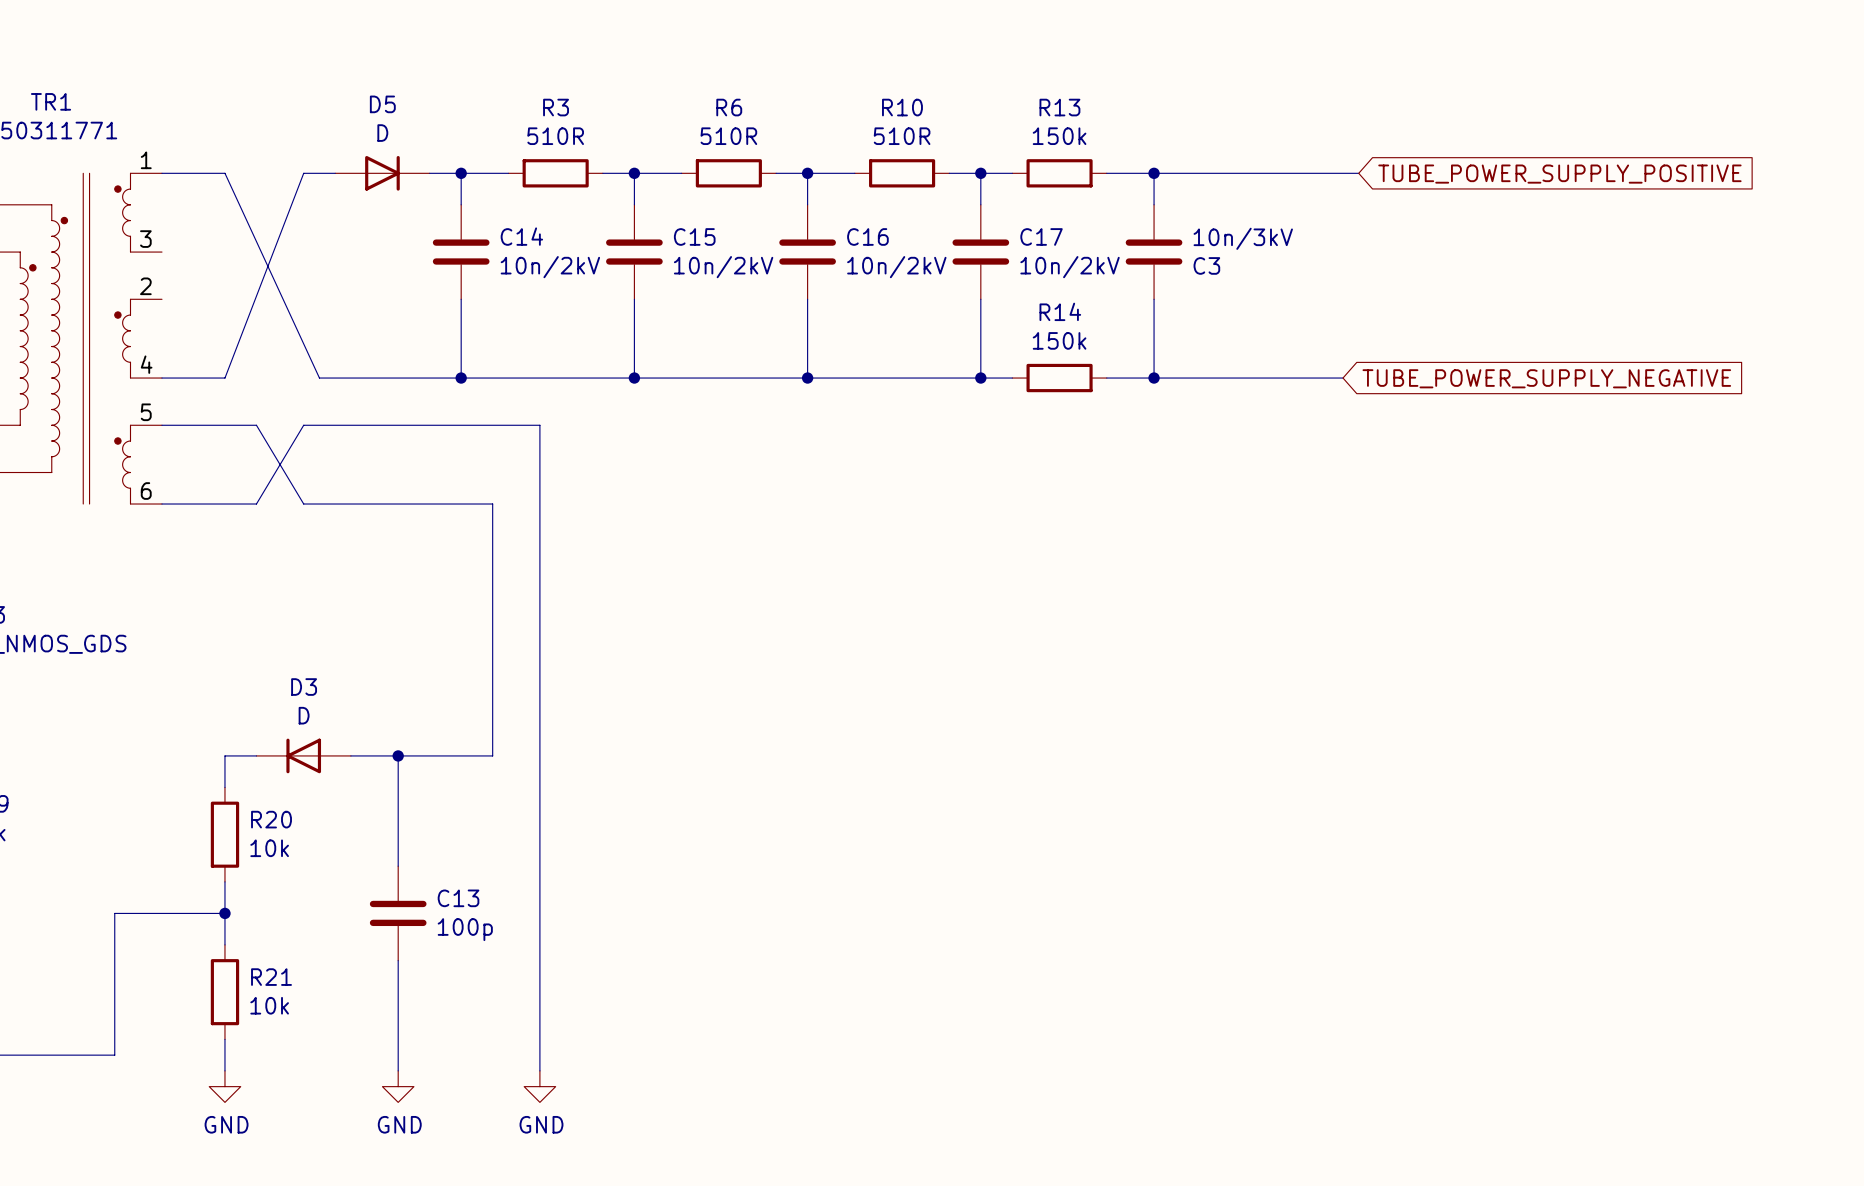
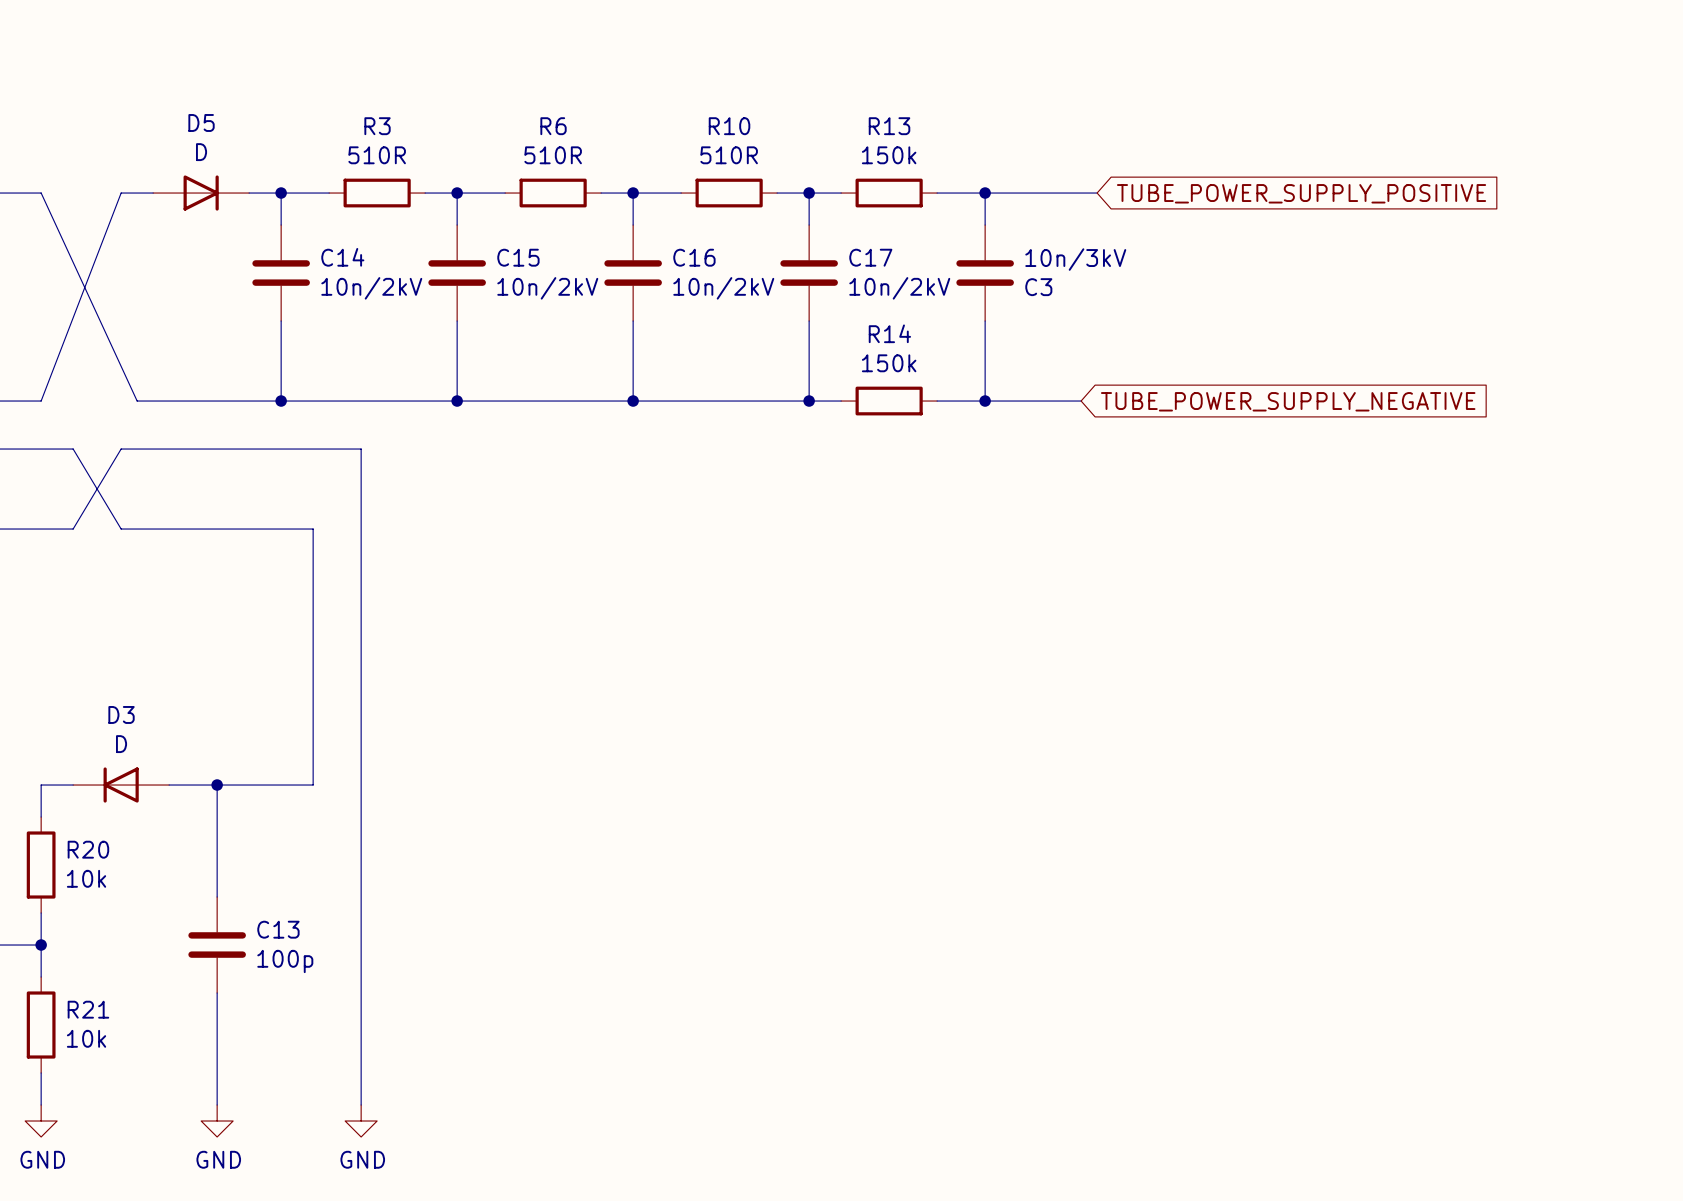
wire: (1264, 173) (1358, 173) -> none
global label position: TUBE_POWER_SUPPLY_POSITIVE (1559, 174) -> TUBE_POWER_SUPPLY_POSITIVE (1301, 193)
wire: (1248, 378) (1343, 378) -> none
global label position: TUBE_POWER_SUPPLY_NEGATIVE (1546, 378) -> TUBE_POWER_SUPPLY_NEGATIVE (1288, 401)

